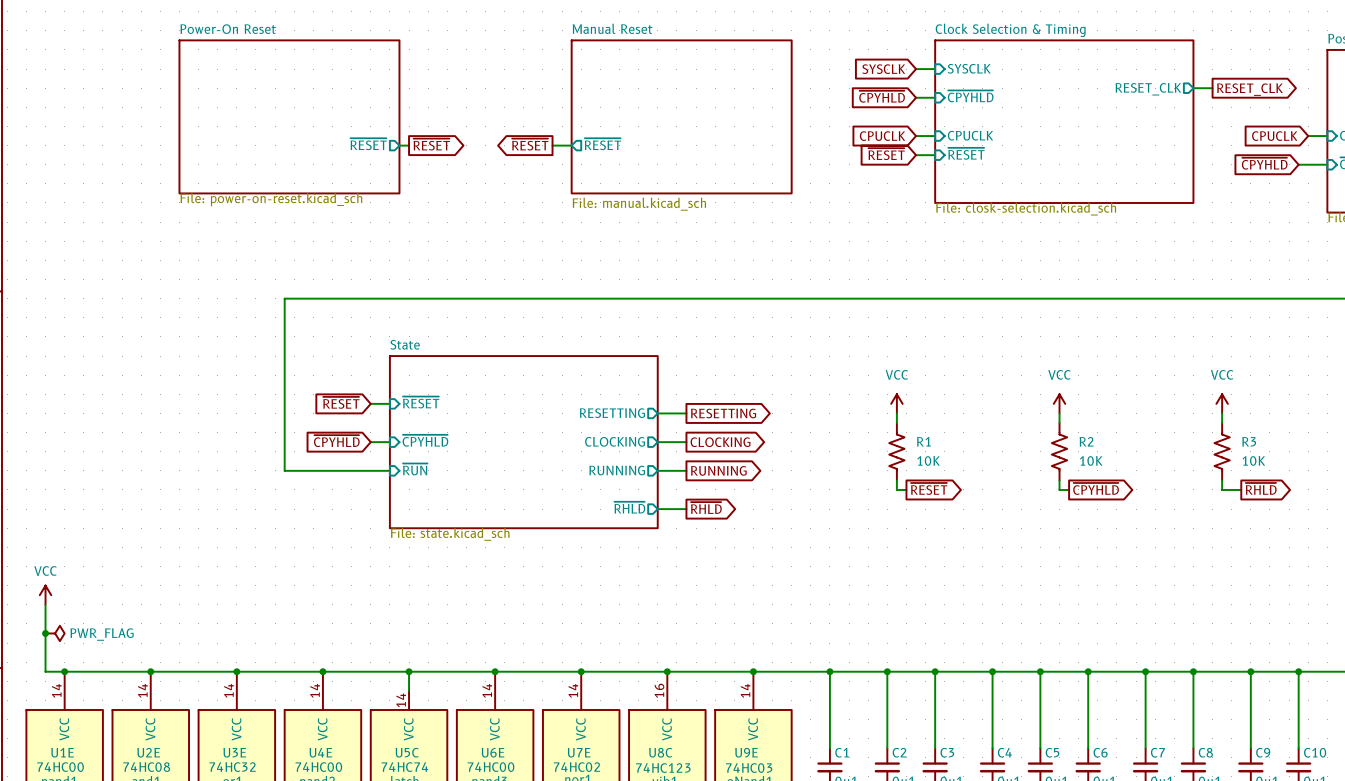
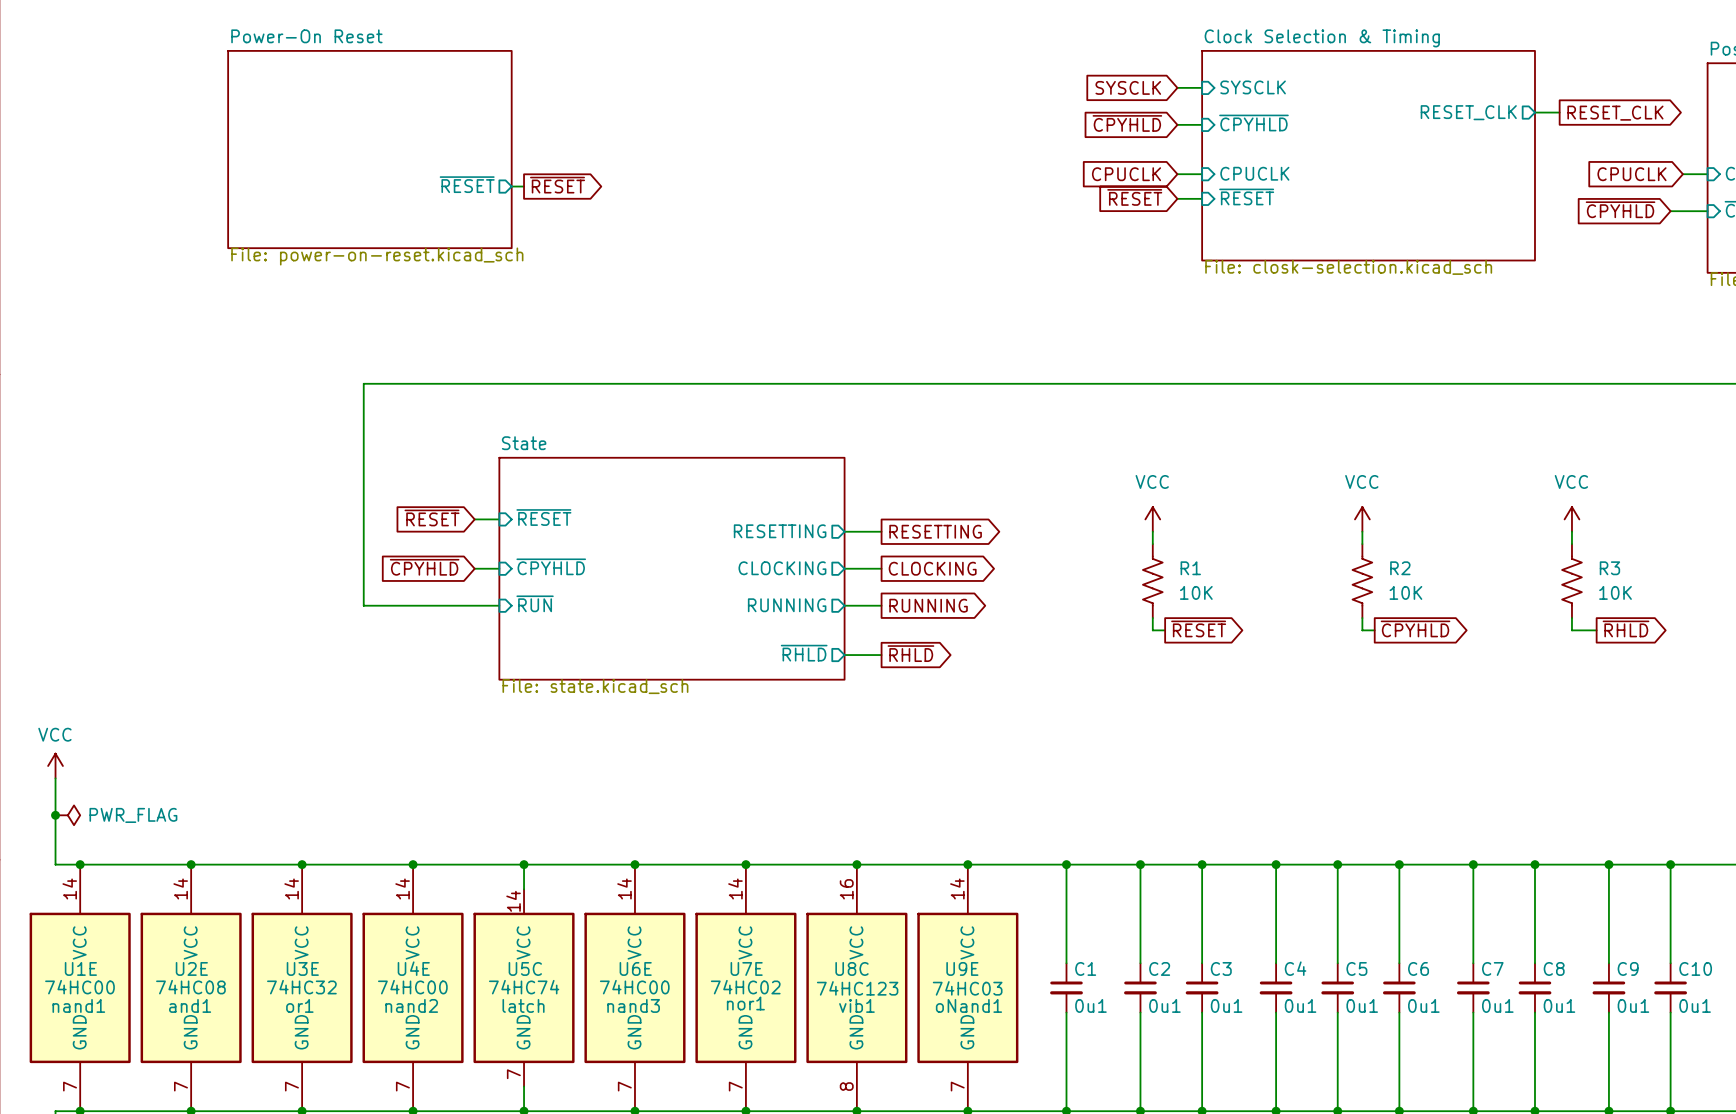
sheet Manual Reset: File: manual.kicad_sch (681, 116) -> none
global label: ~{RESET} (530, 144) -> none
sheet pin: ~{RESET} (602, 144) -> none
wire: (552, 145) (571, 145) -> none

